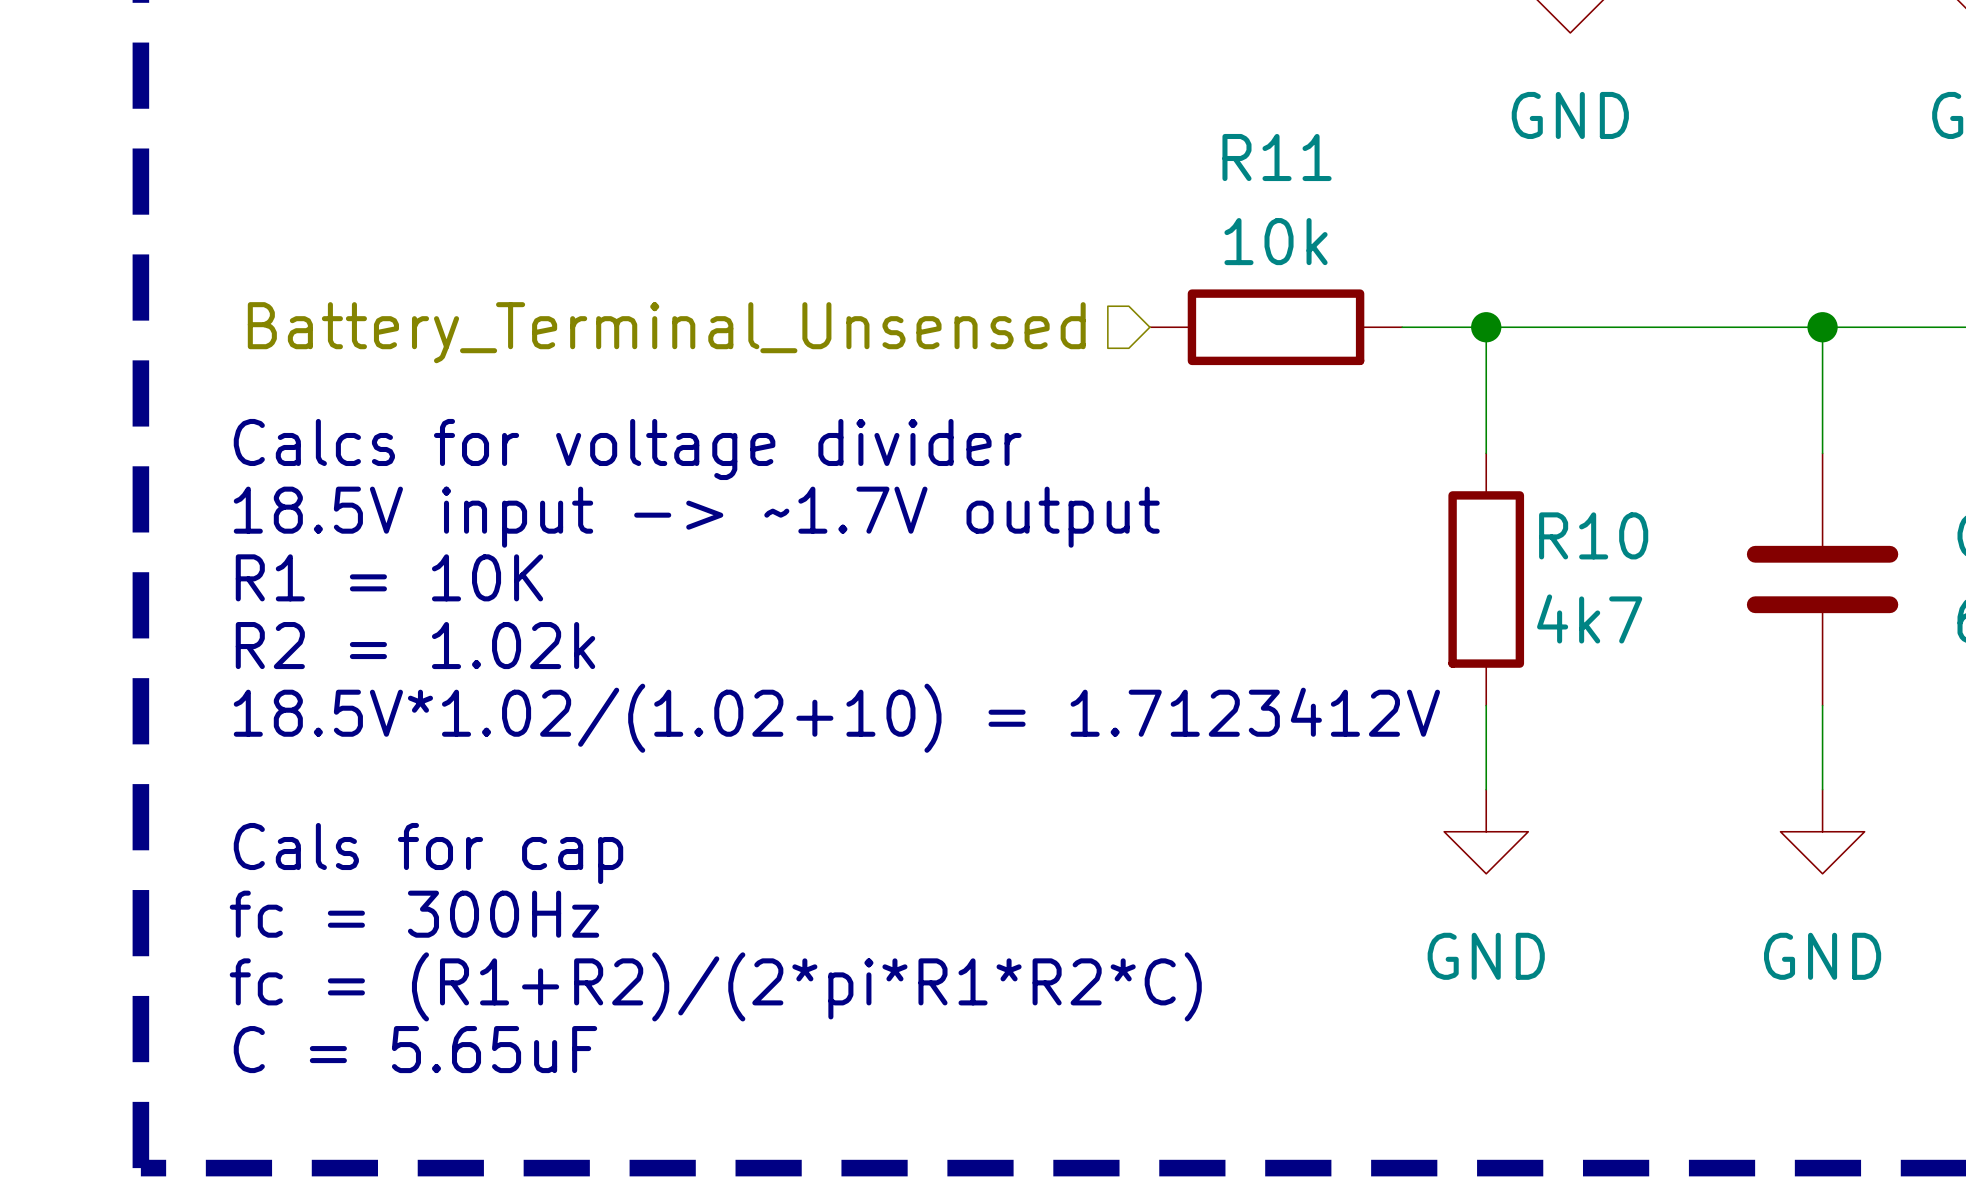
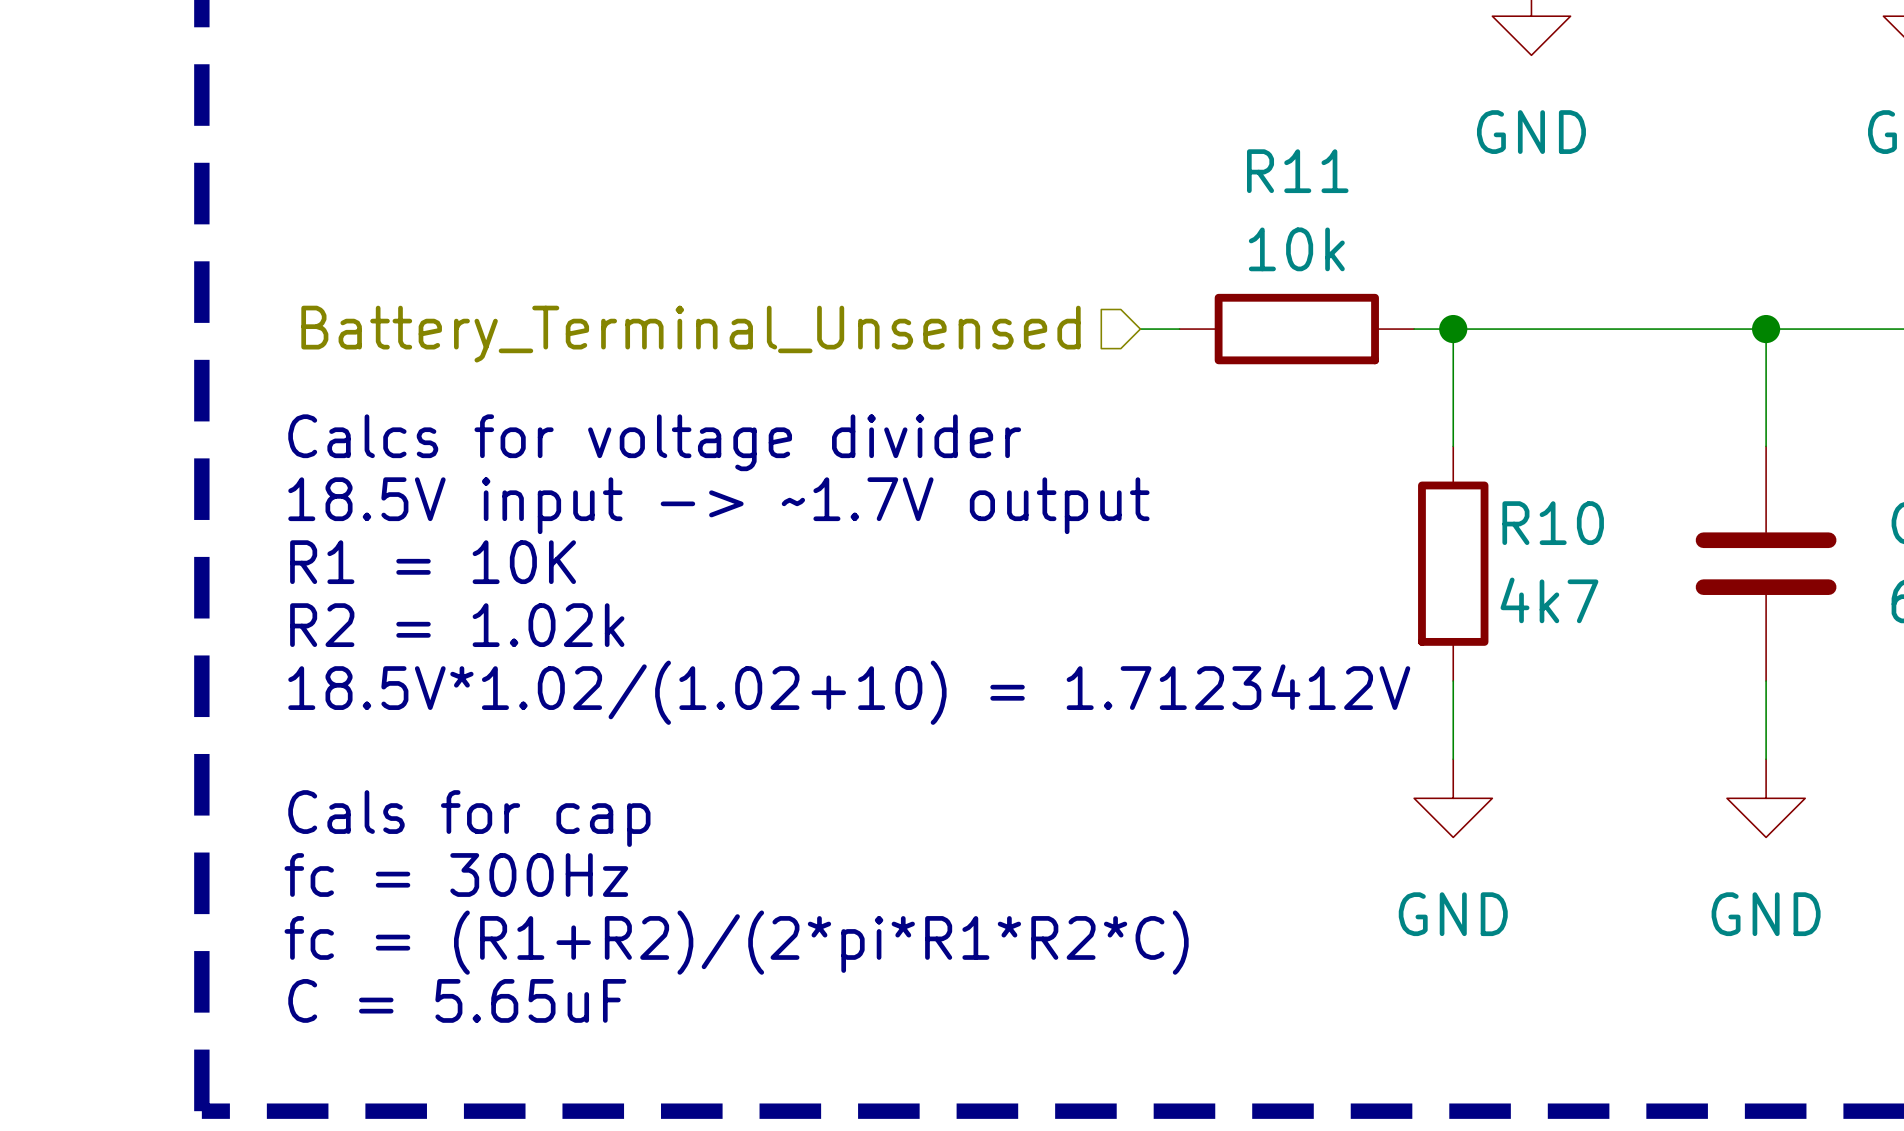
R11 position: (1276, 327) -> (1296, 329)

